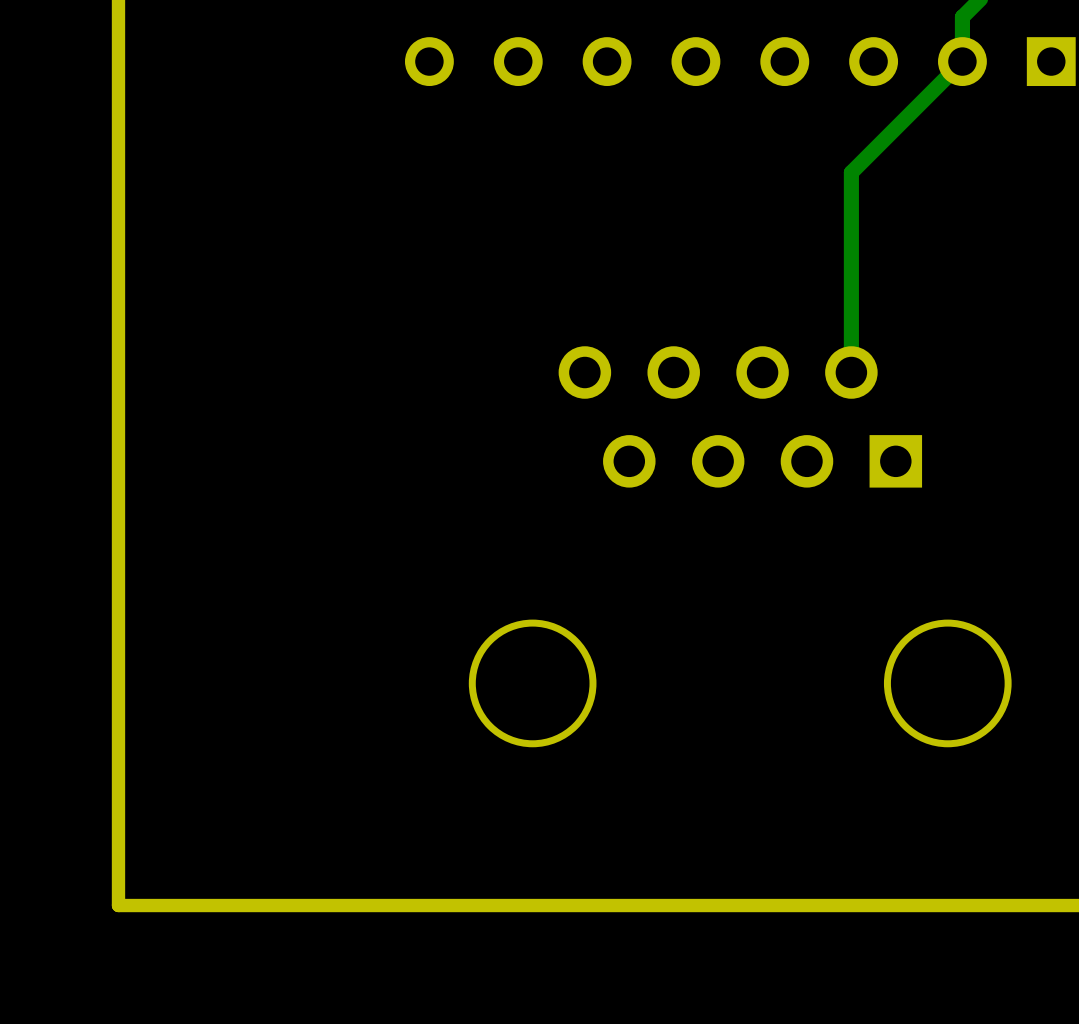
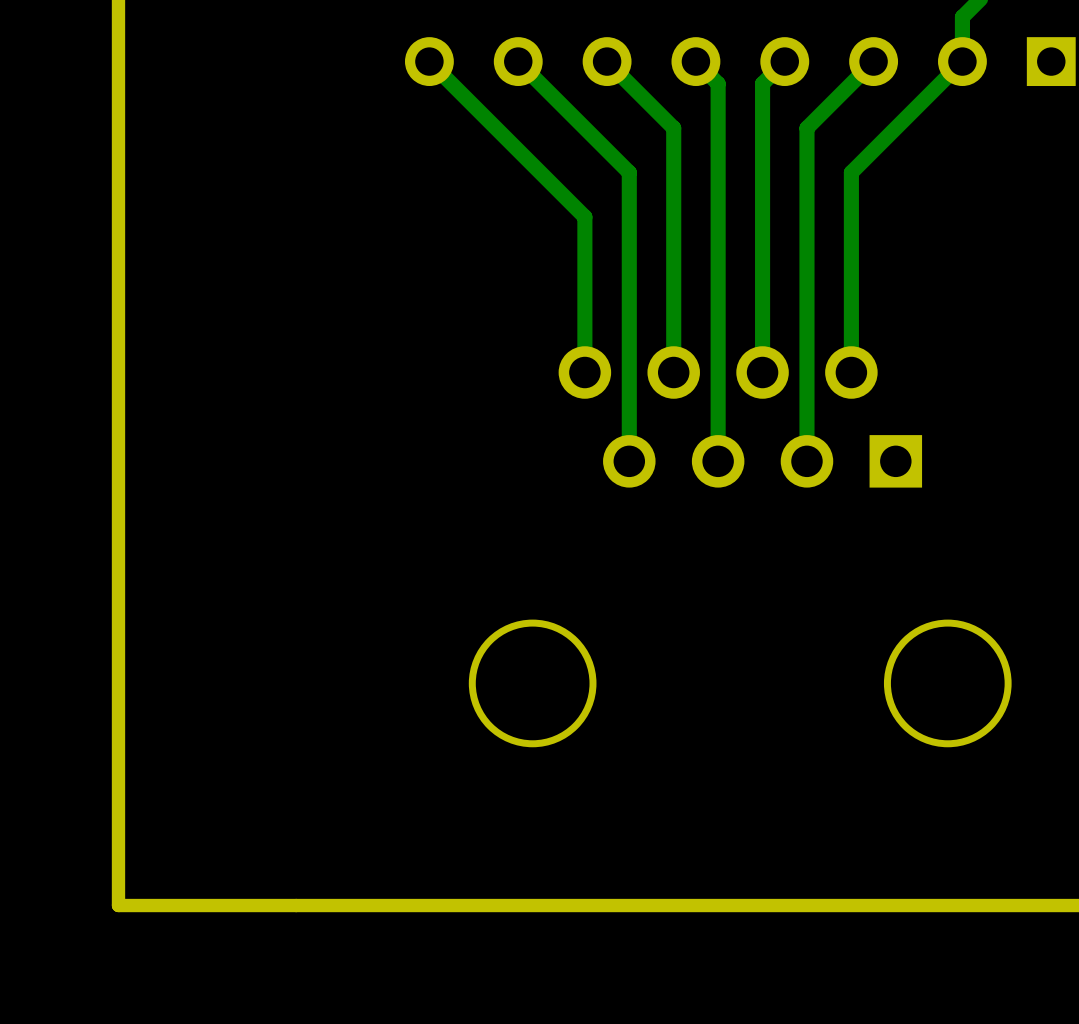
track: none -> (429, 61) (584, 217) (584, 372)
track: none -> (518, 61) (629, 172) (629, 461)
track: none -> (607, 61) (673, 128) (673, 372)
track: none -> (695, 61) (718, 83) (718, 461)
track: none -> (784, 61) (762, 83) (762, 372)
track: none -> (873, 61) (806, 128) (806, 461)

